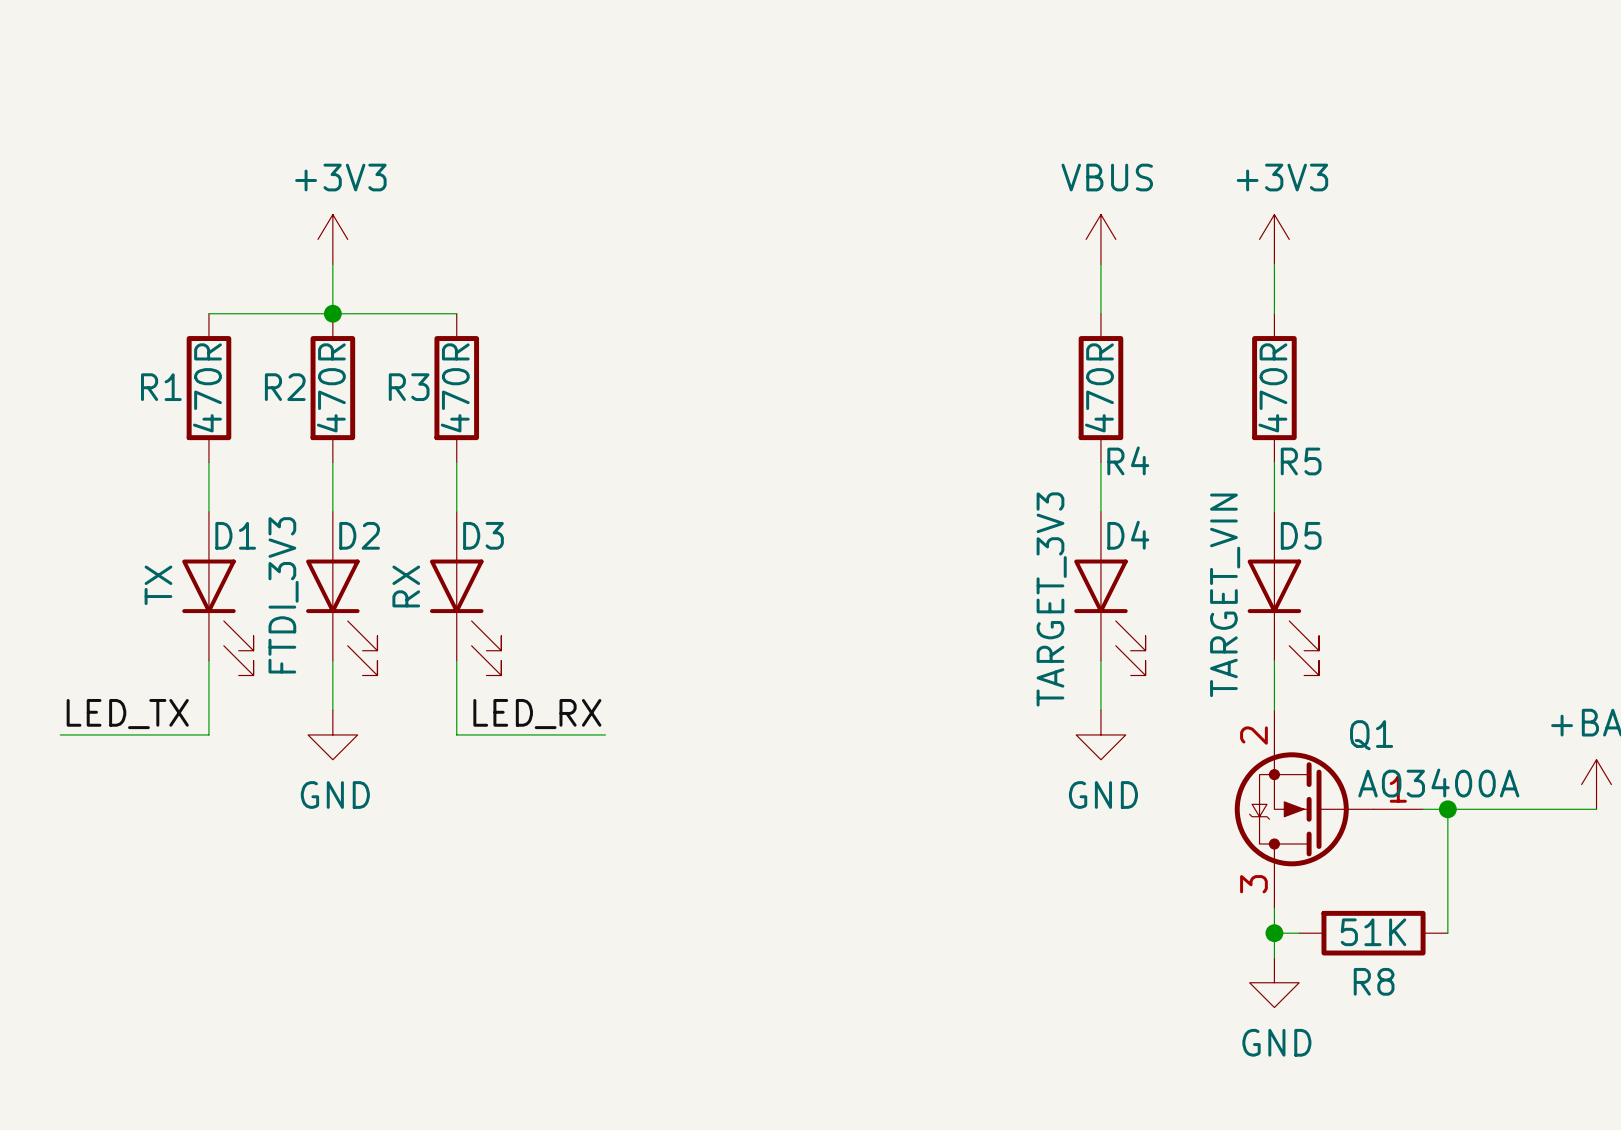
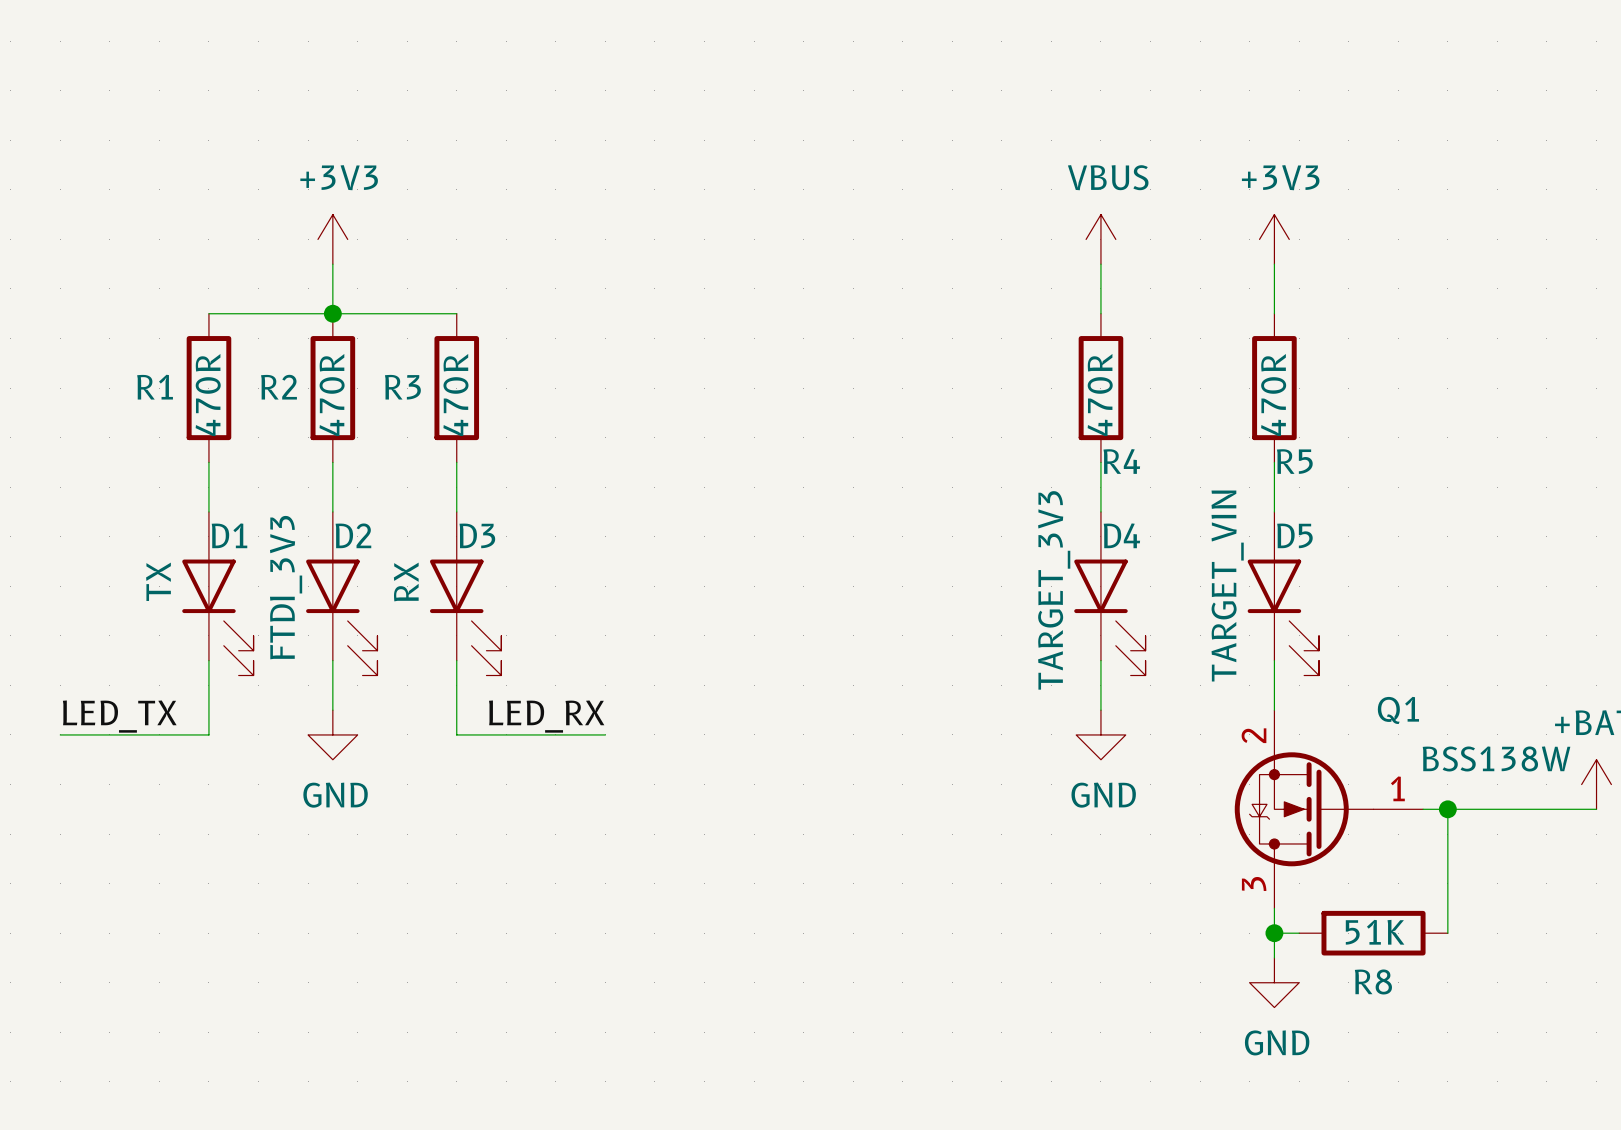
Q1 name position: Q1 (1371, 735) -> Q1 (1398, 710)
Q1 value: AO3400A (1438, 783) -> BSS138W (1496, 758)

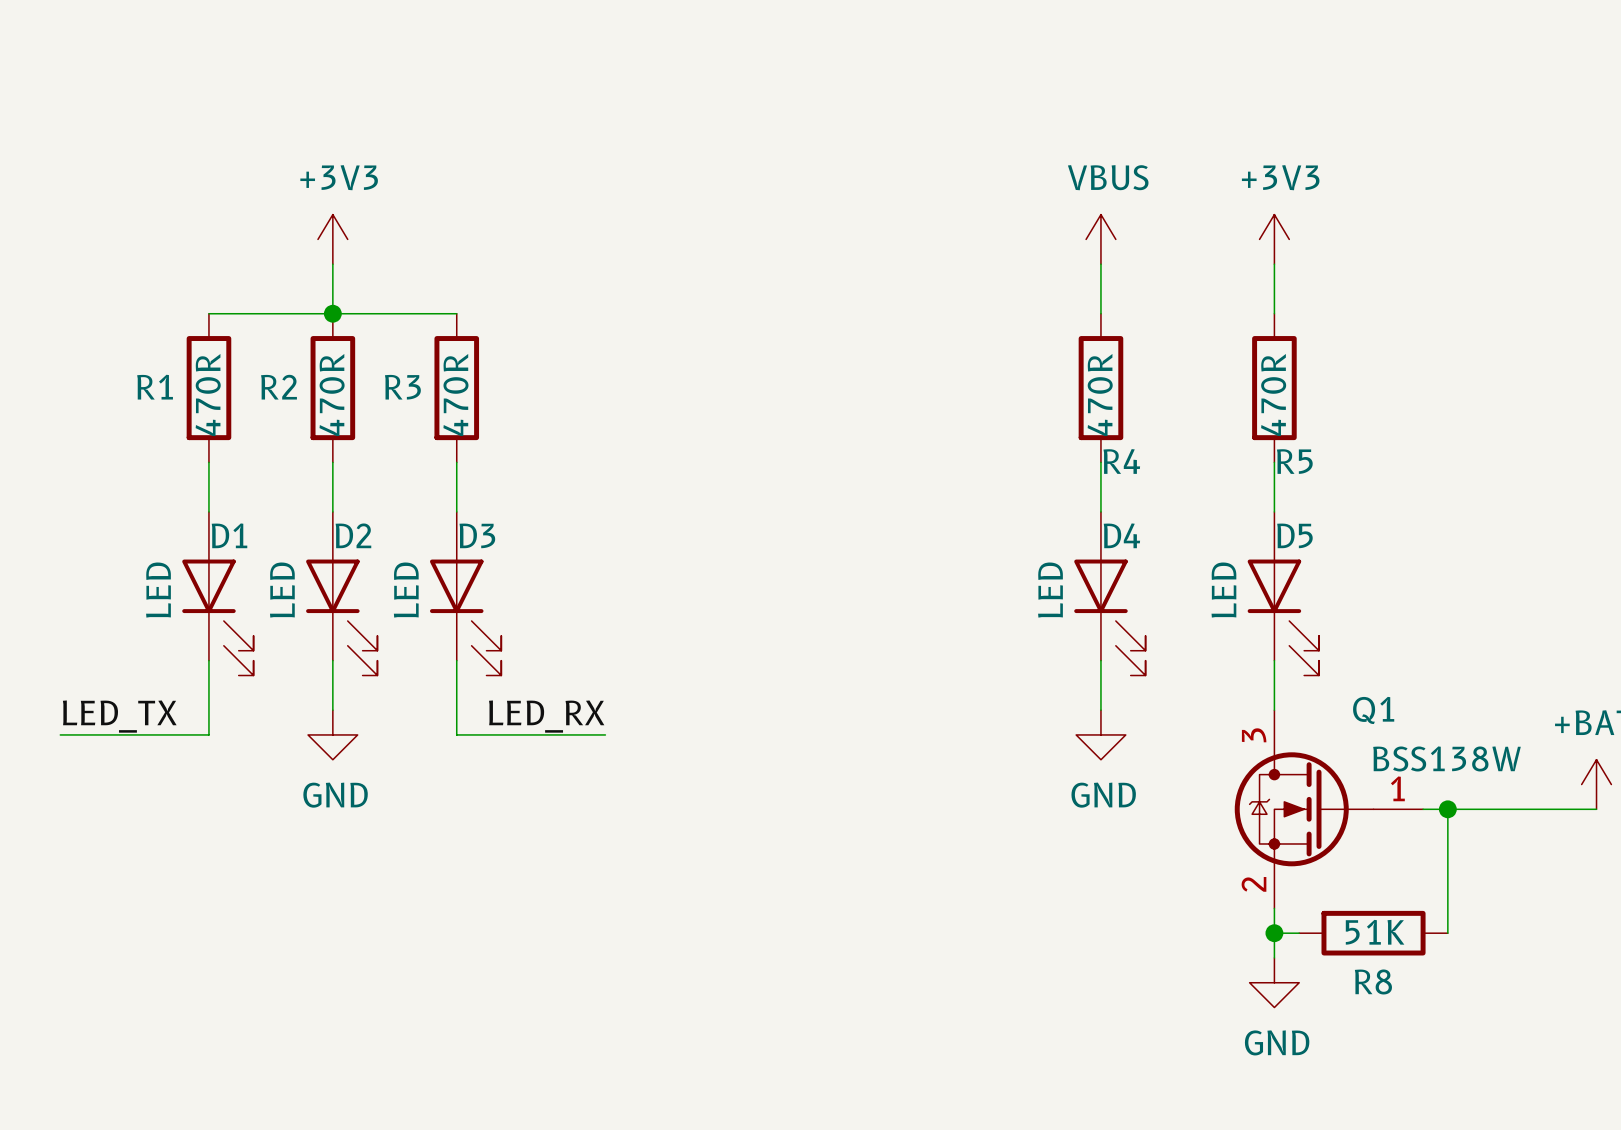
D1 value: TX (158, 581) -> LED (158, 590)
D3 value: RX (406, 581) -> LED (406, 590)
D5 value: TARGET_VIN (1227, 586) -> LED (1223, 590)
D2 value: FTDI_3V3 (286, 587) -> LED (282, 590)
D4 value: TARGET_3V3 (1054, 590) -> LED (1050, 590)
Q1 value position: BSS138W (1496, 758) -> BSS138W (1446, 758)
Q1 flip: as is (1304, 809) -> up-down (1304, 809)

